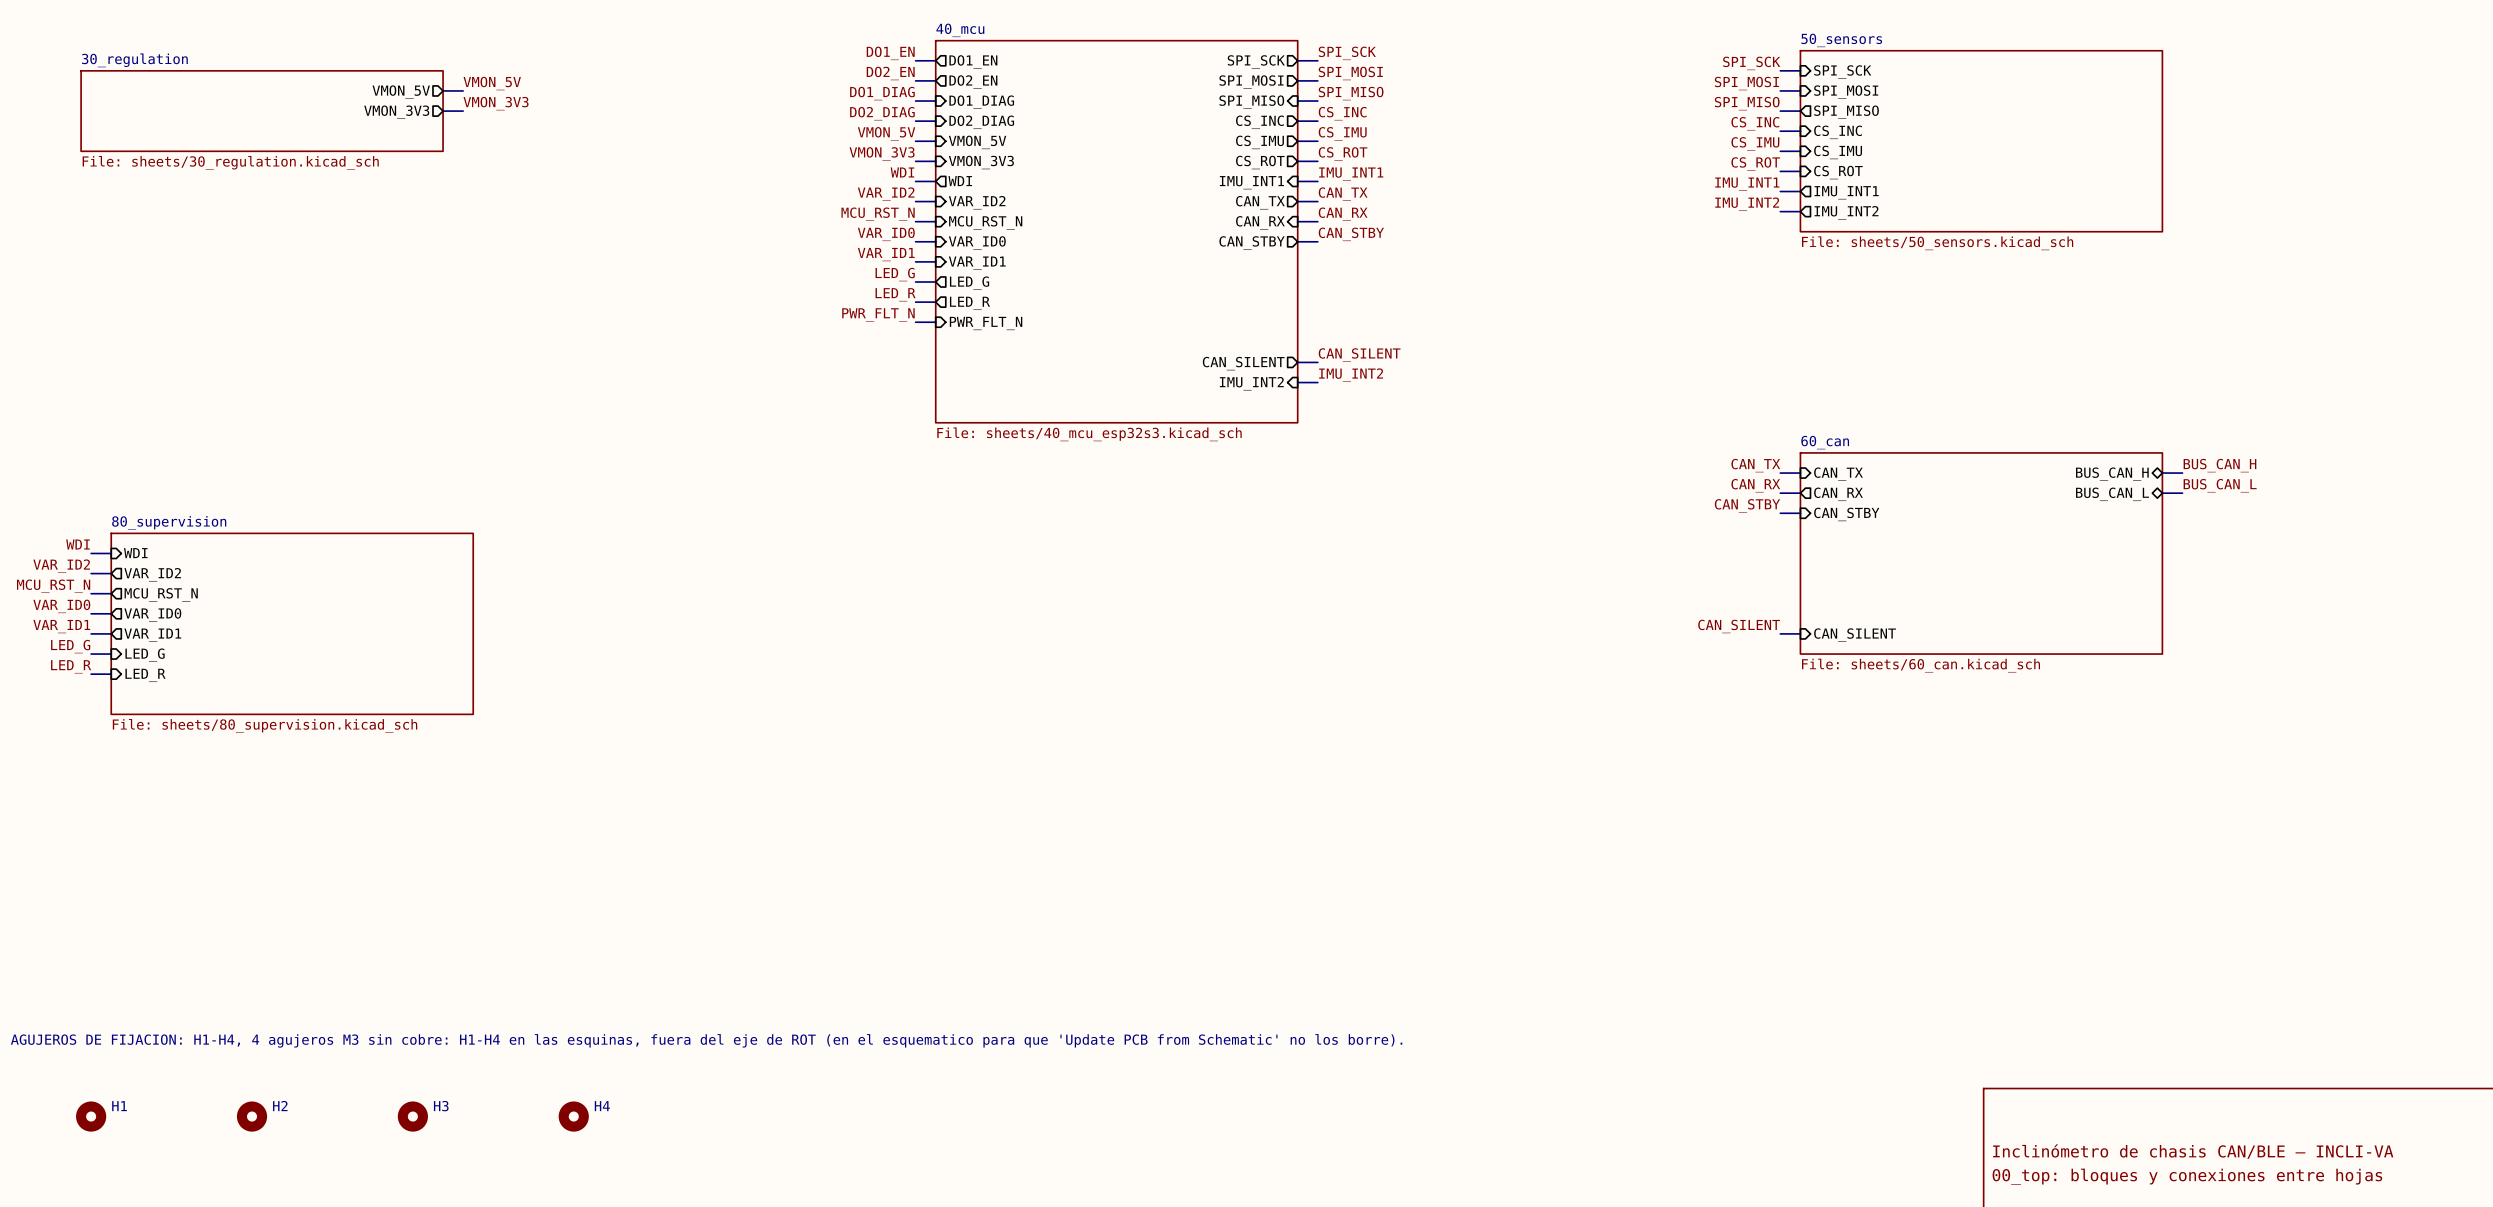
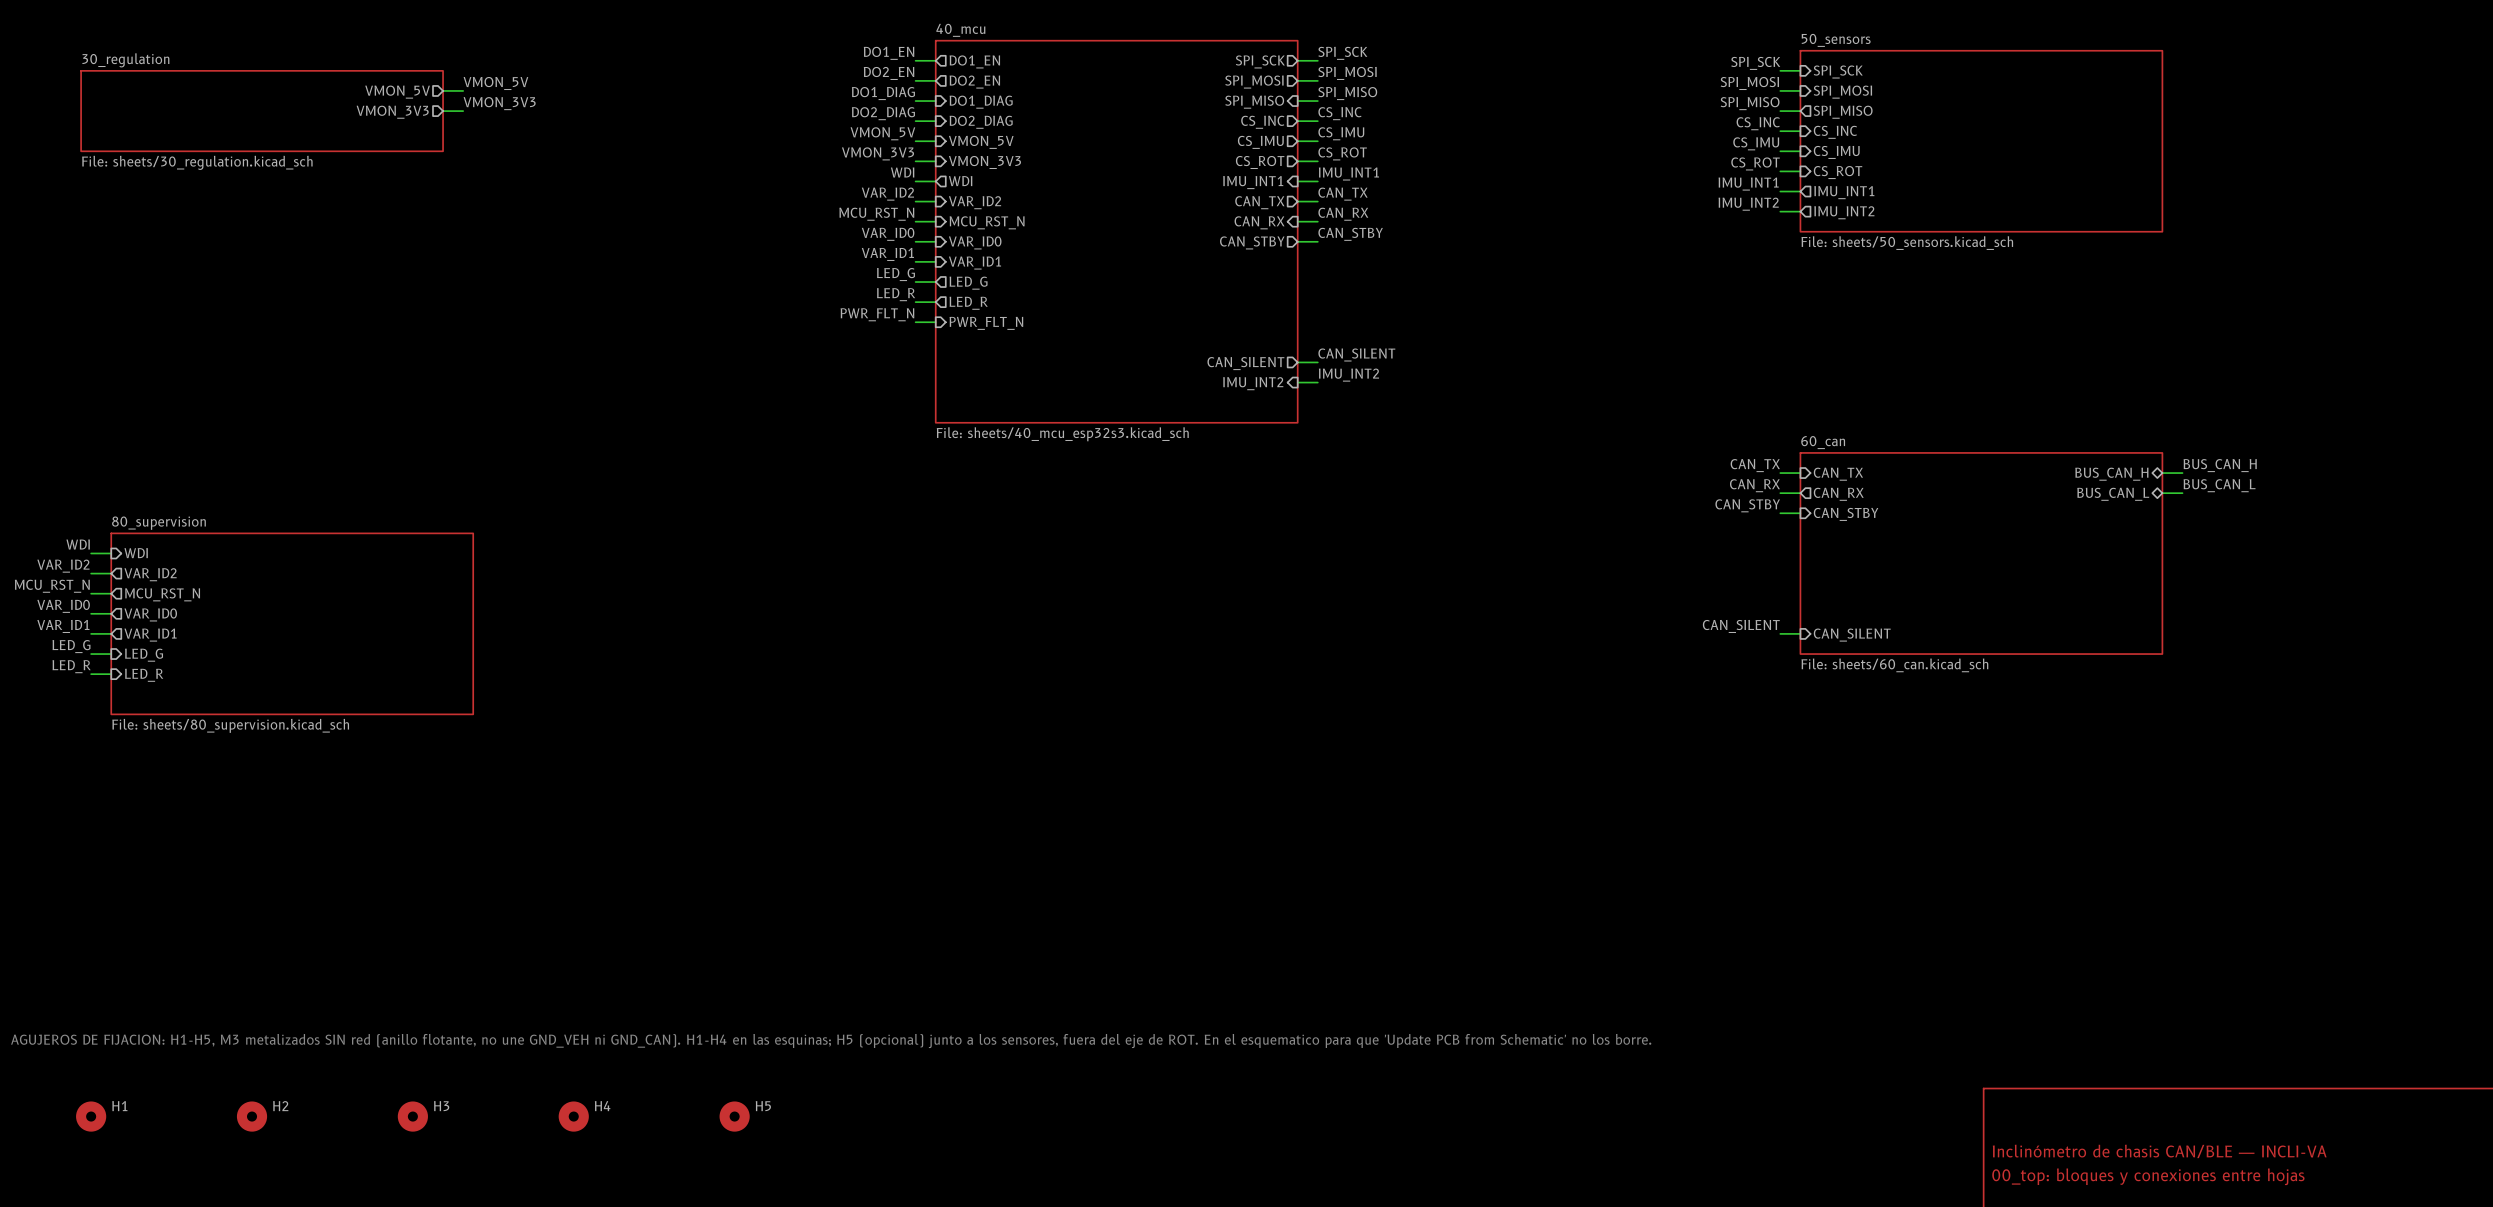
text: AGUJEROS DE FIJACION: H1-H4, 4 agujeros M3 sin cobre: H1-H4 en las esquinas, fuera del eje de ROT (en el esquematico para que 'Update PCB from Schematic' no los borre). (706, 1040) -> AGUJEROS DE FIJACION: H1-H5, M3 metalizados SIN red (anillo flotante, no une GND_VEH ni GND_CAN). H1-H4 en las esquinas; H5 (opcional) junto a los sensores, fuera del eje de ROT. En el esquematico para que 'Update PCB from Schematic' no los borre. (831, 1041)
H5: none -> (734, 1116)

